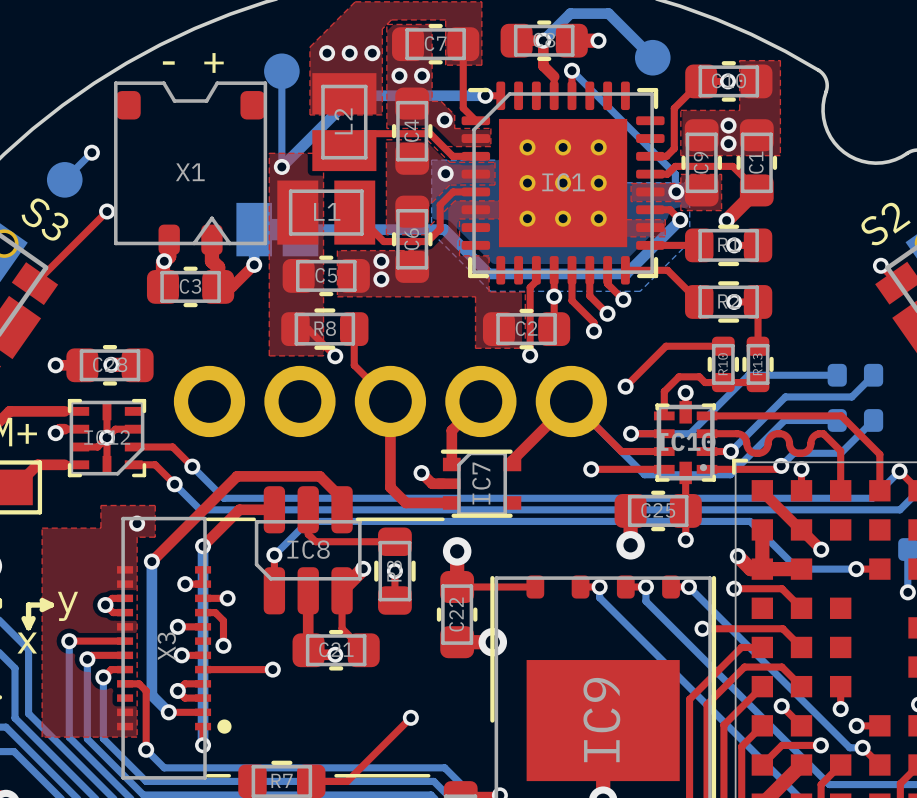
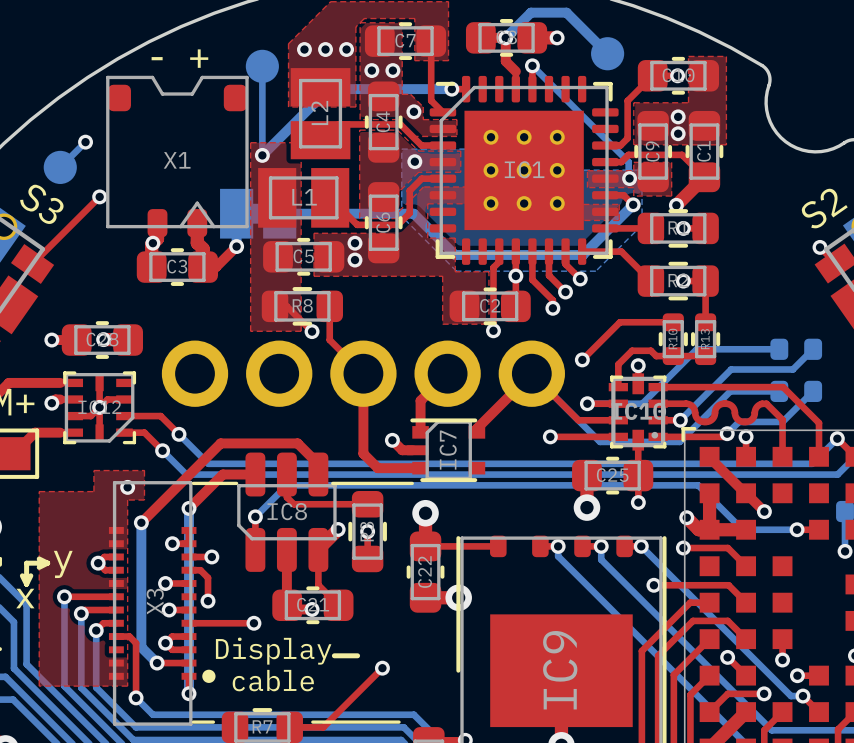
text: none -> Display (273, 651)
line: none -> (334, 655) (357, 655)
text: none -> cable (273, 680)

